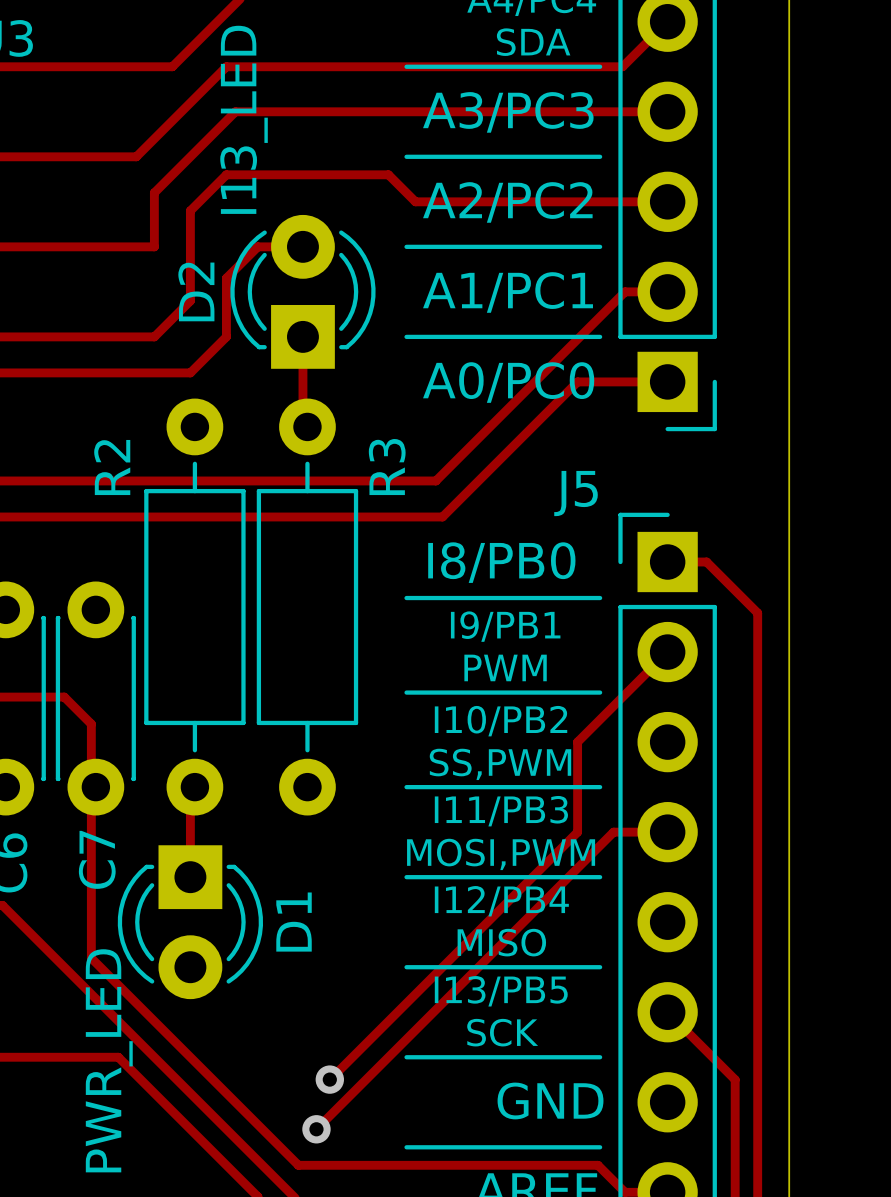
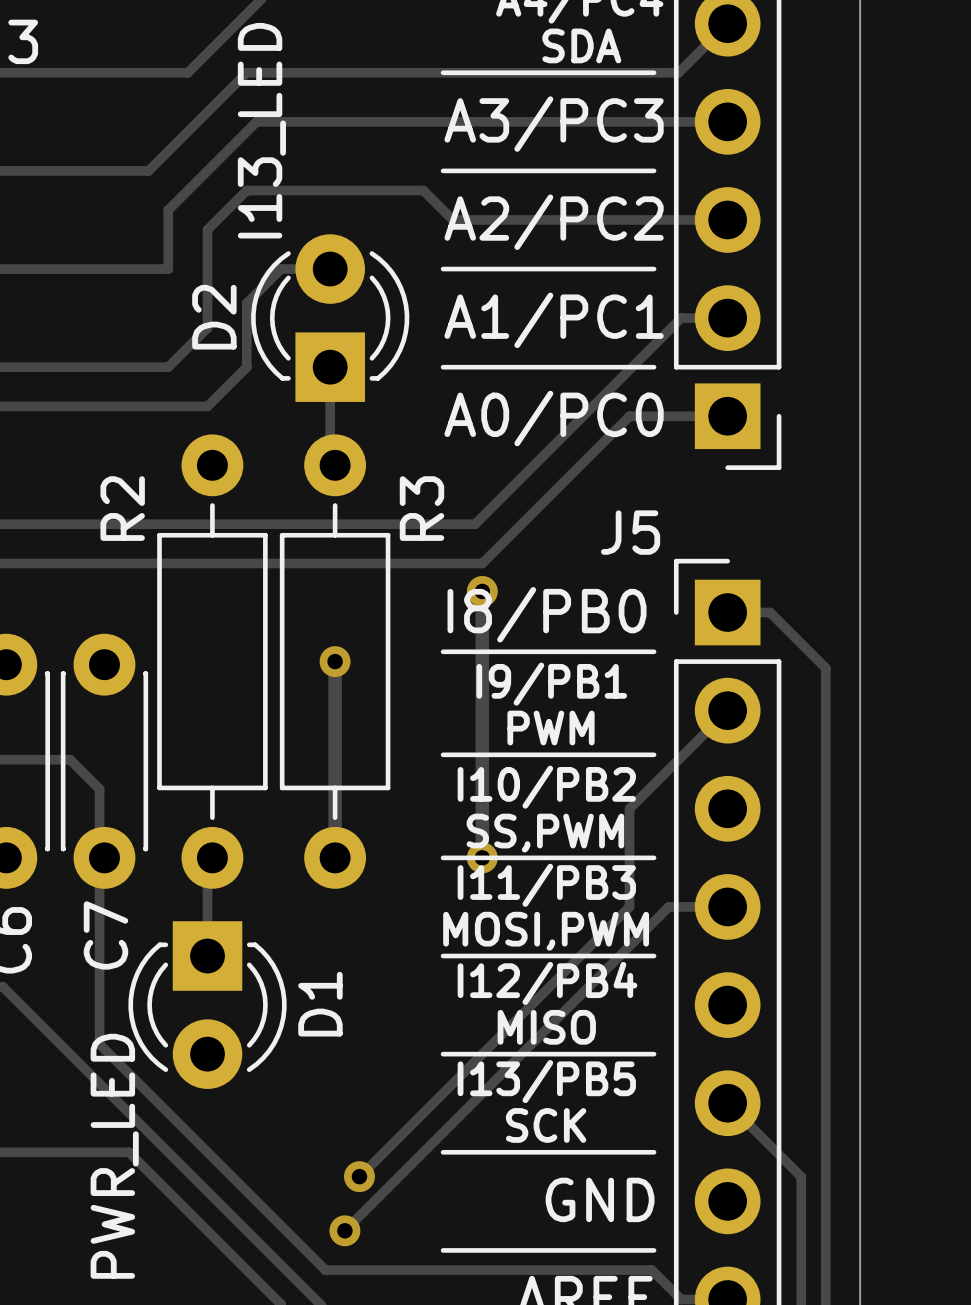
track: none -> (482, 587) (482, 857)
via: none -> (482, 591)
track: none -> (335, 661) (335, 857)
via: none -> (335, 661)
via: none -> (482, 857)

